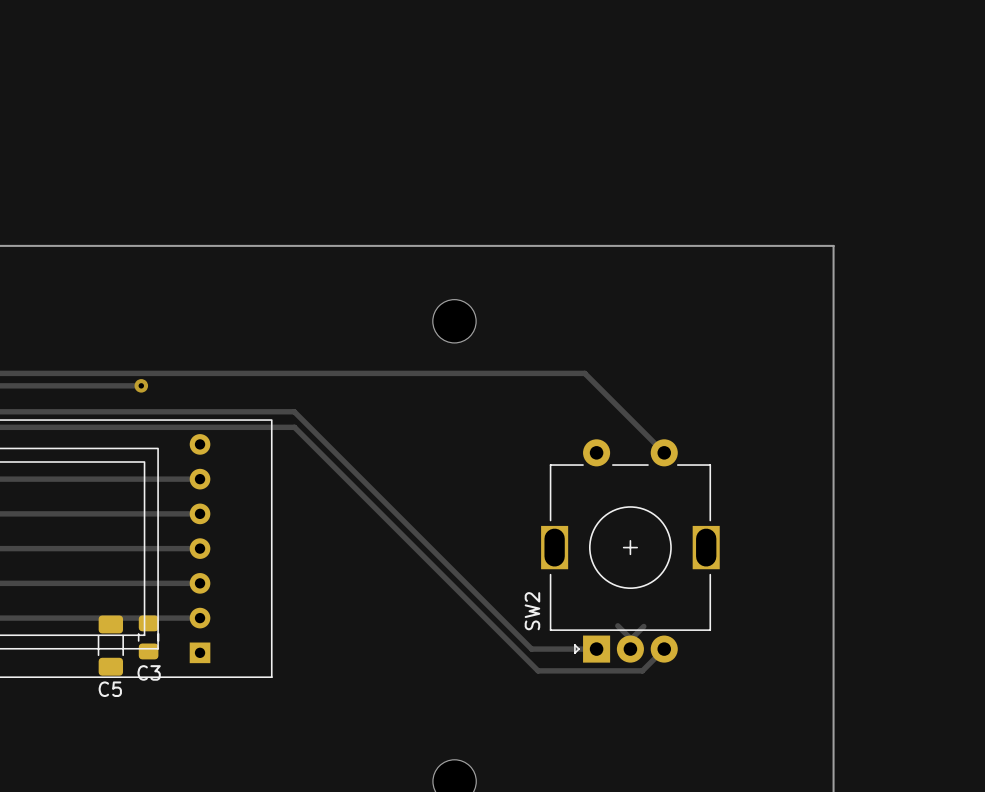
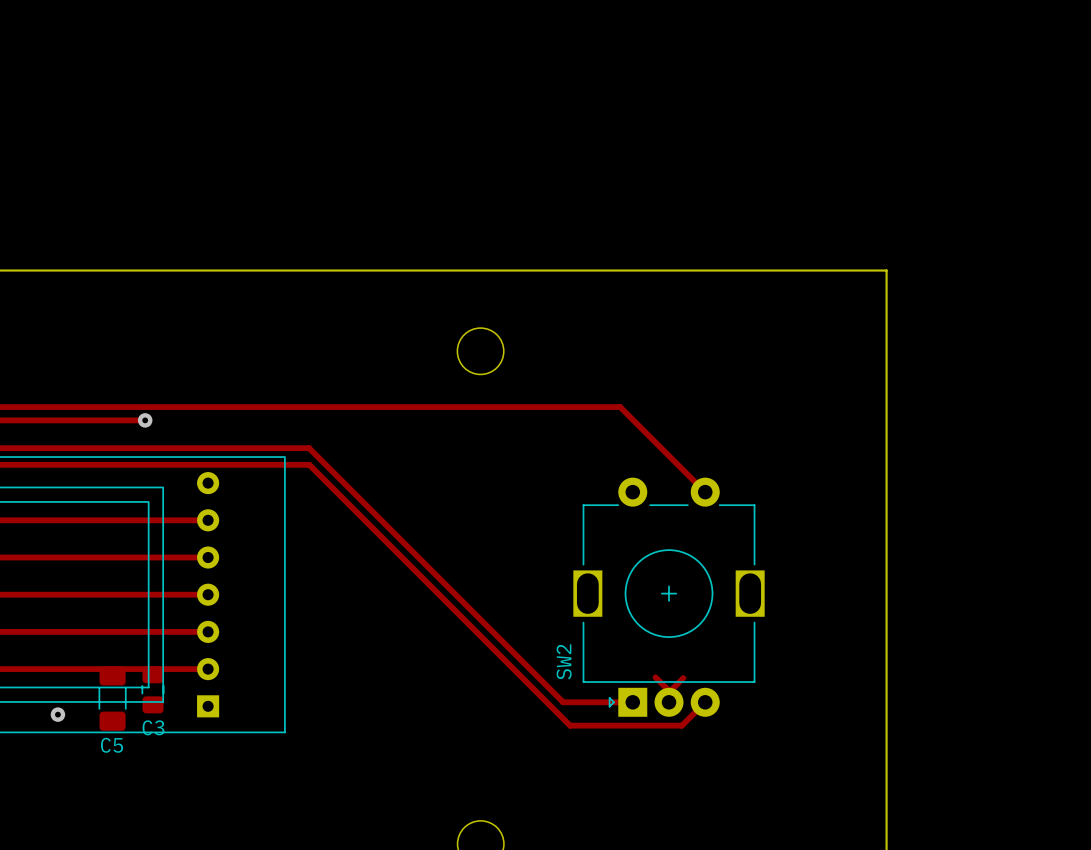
via: none -> (57, 714)

